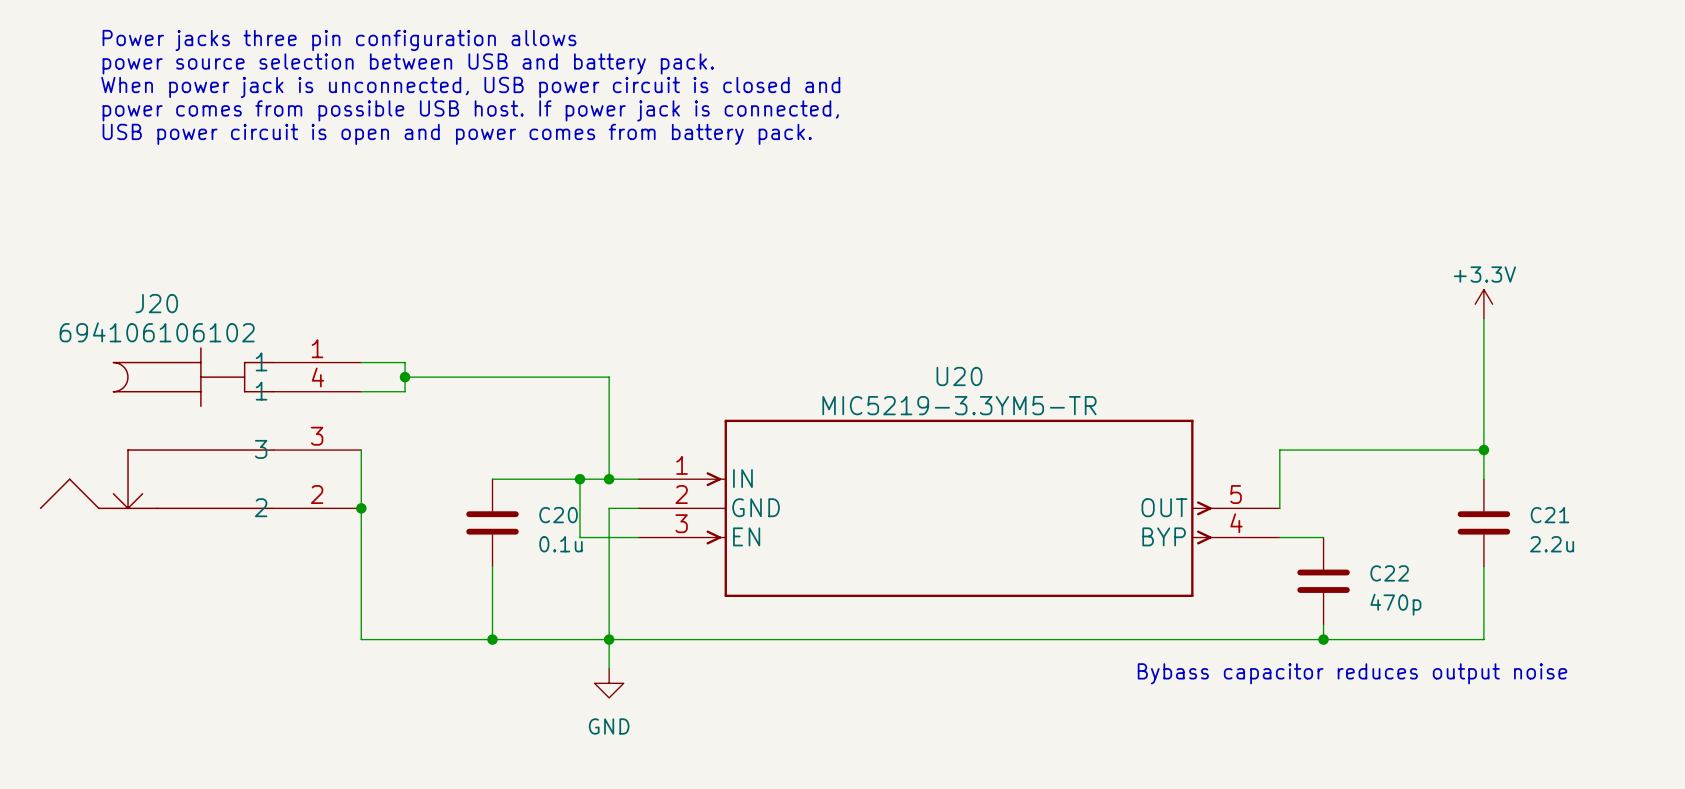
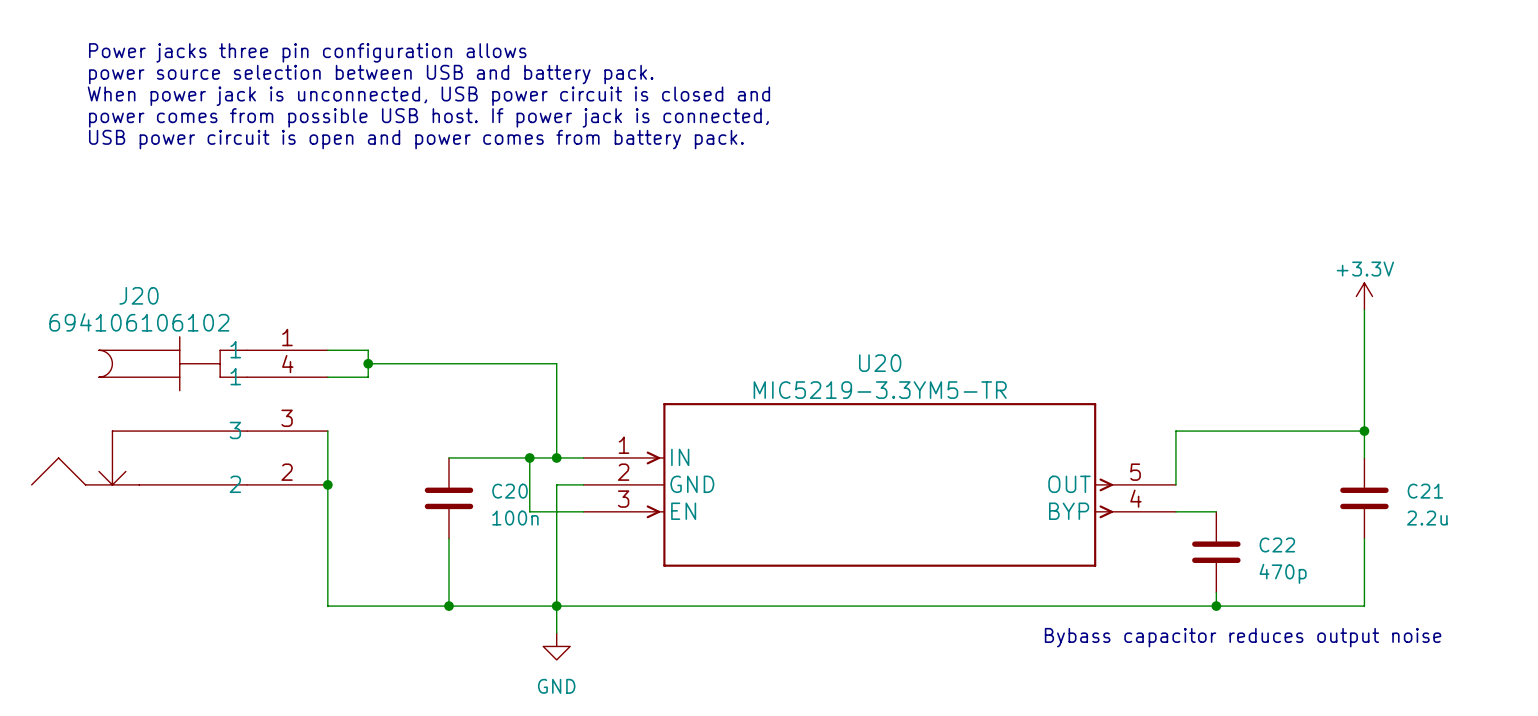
C20 value: 0.1u (561, 544) -> 100n (515, 518)

